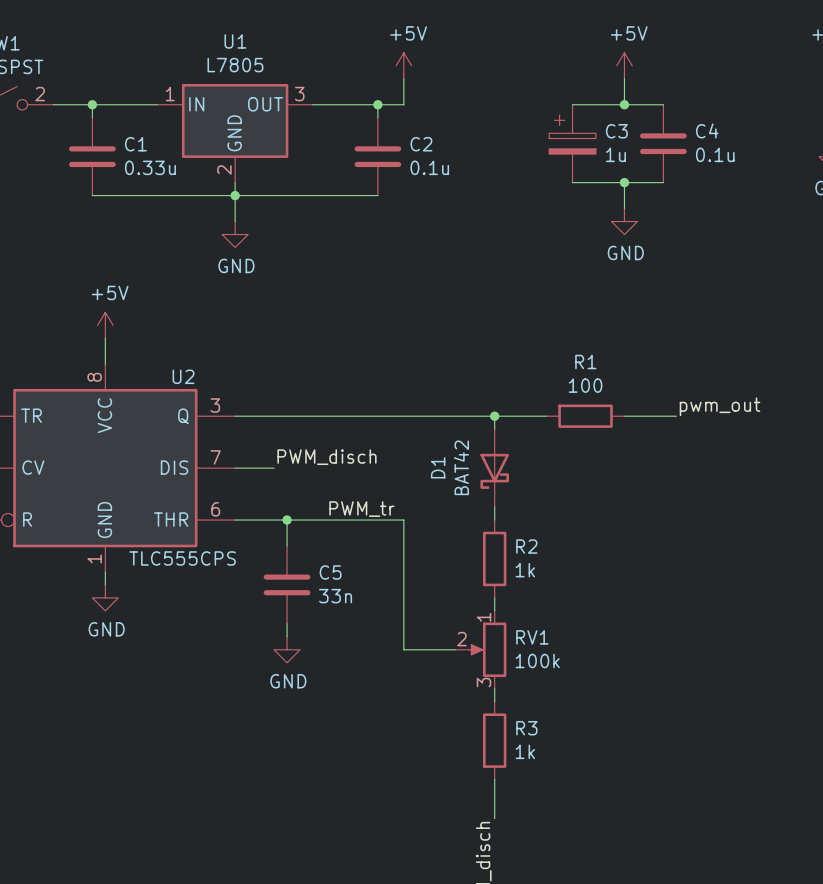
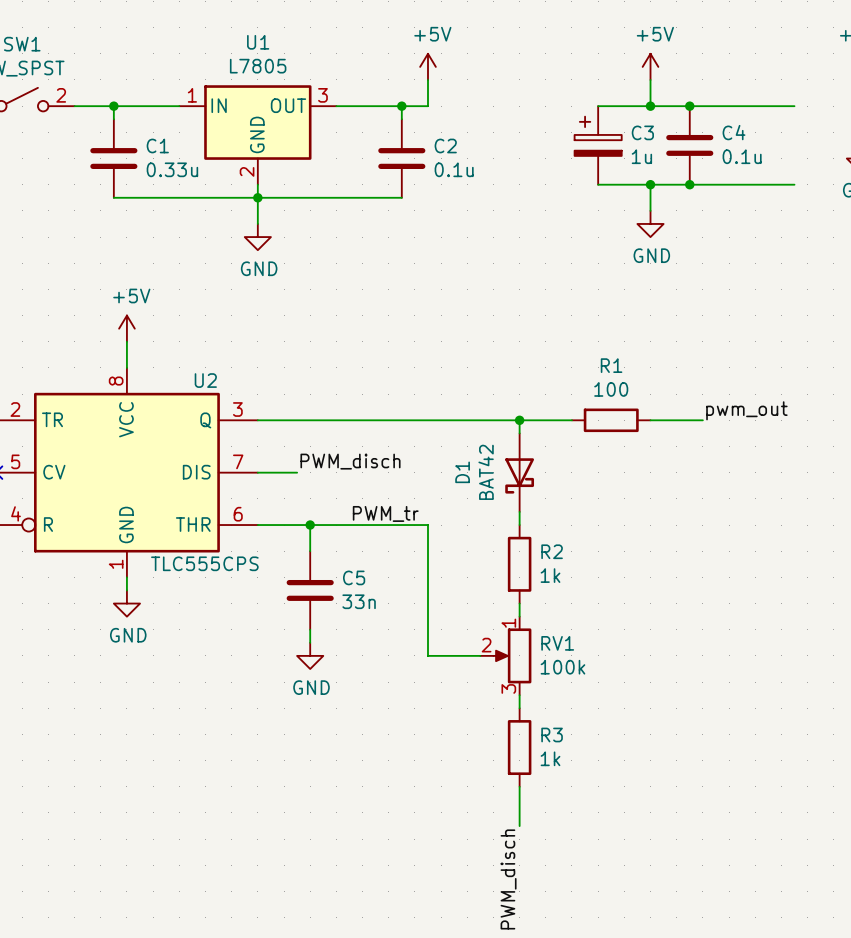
wire: none -> (689, 106) (794, 106)
junction: none -> (689, 106)
wire: none -> (689, 184) (794, 184)
junction: none -> (689, 184)

